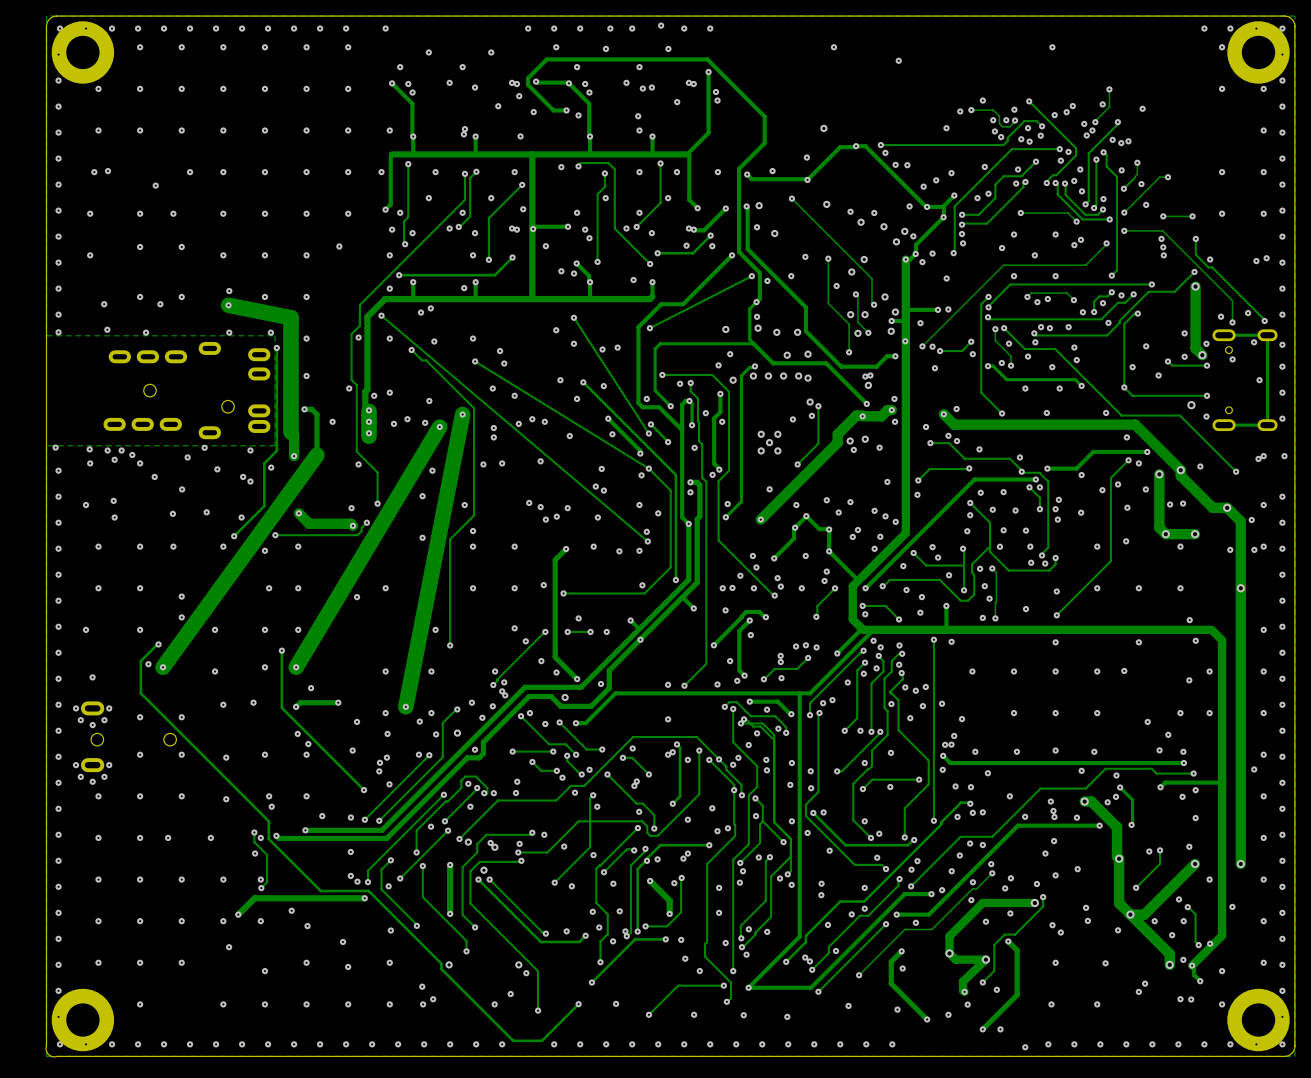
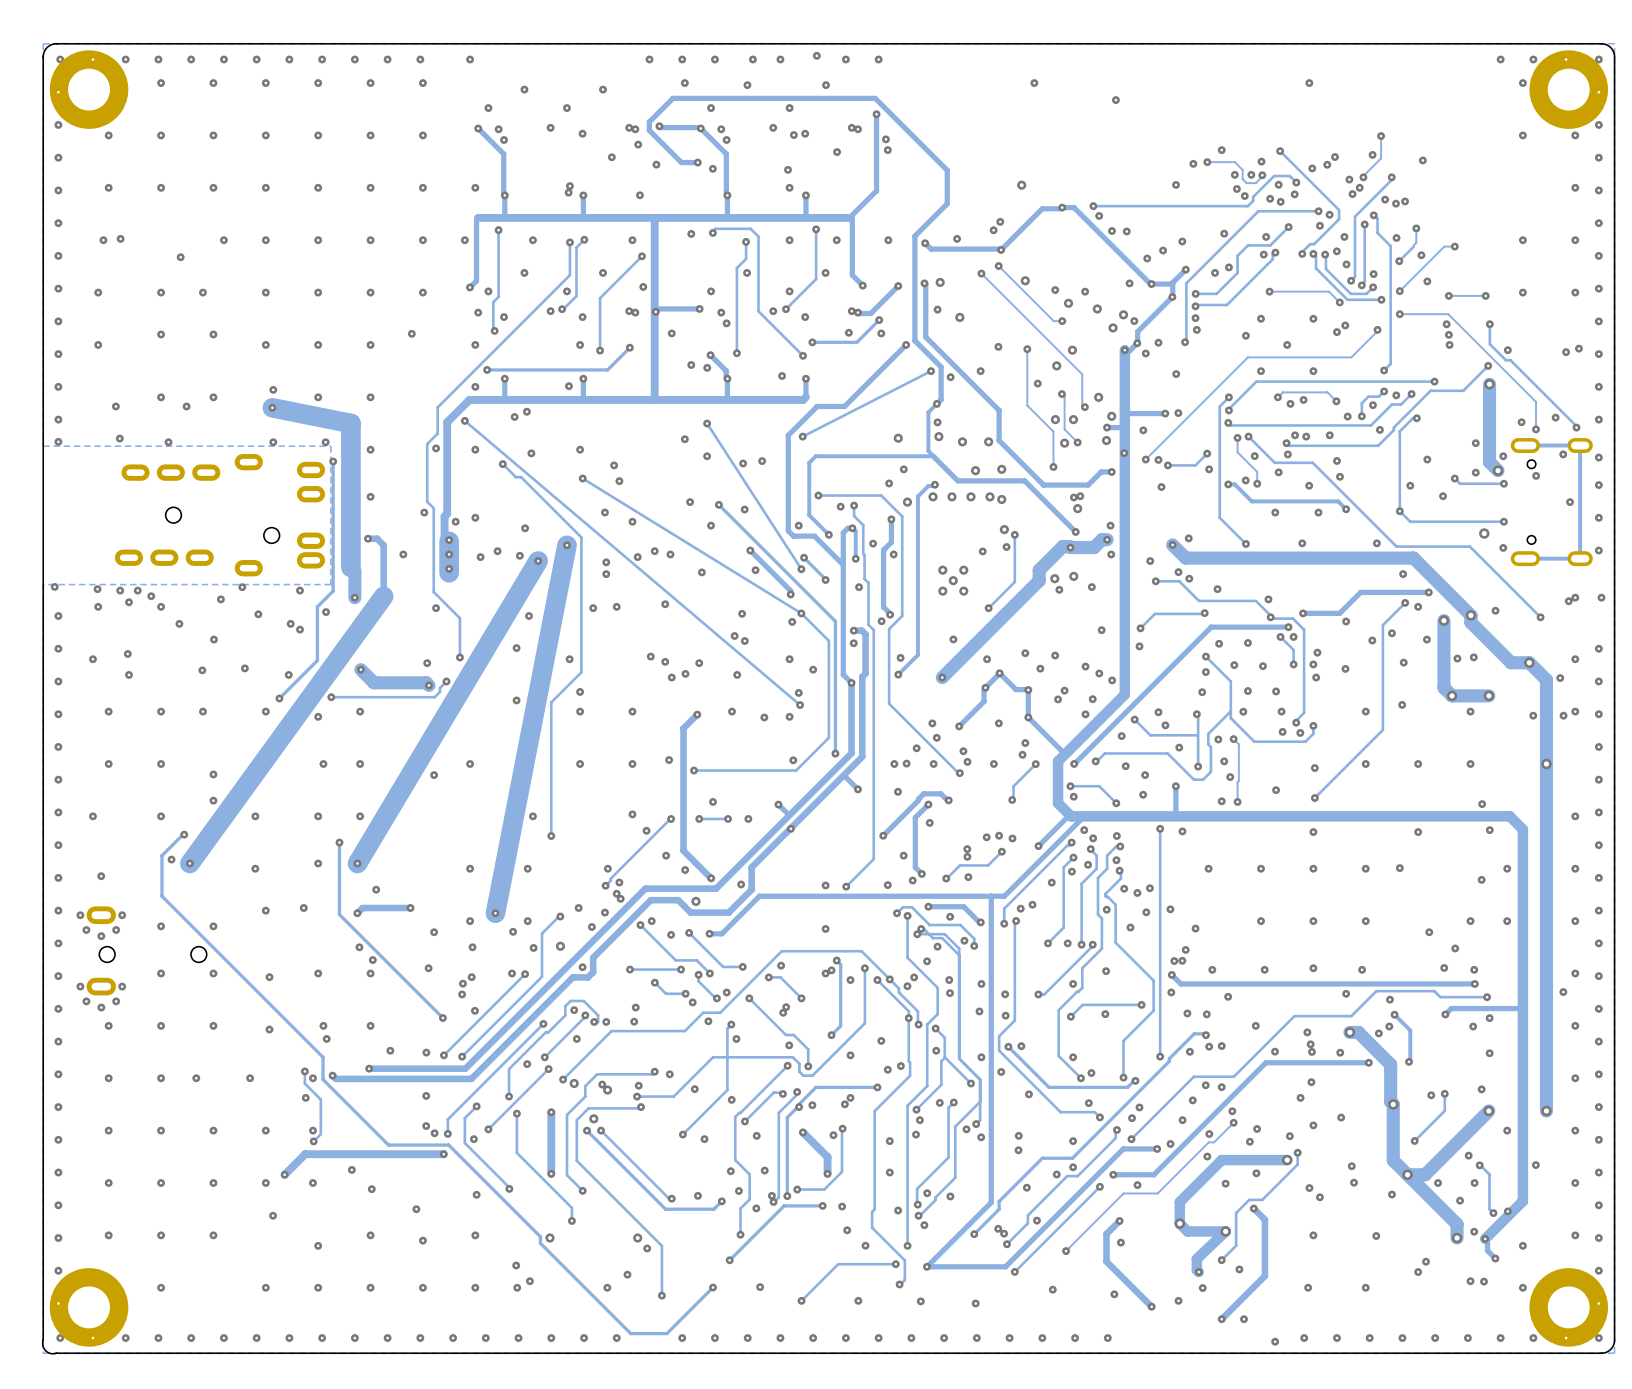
via: none -> (993, 230)
track: none -> (998, 266) (1053, 321) (1062, 321)
via: none -> (998, 266)
via: none -> (1062, 321)

